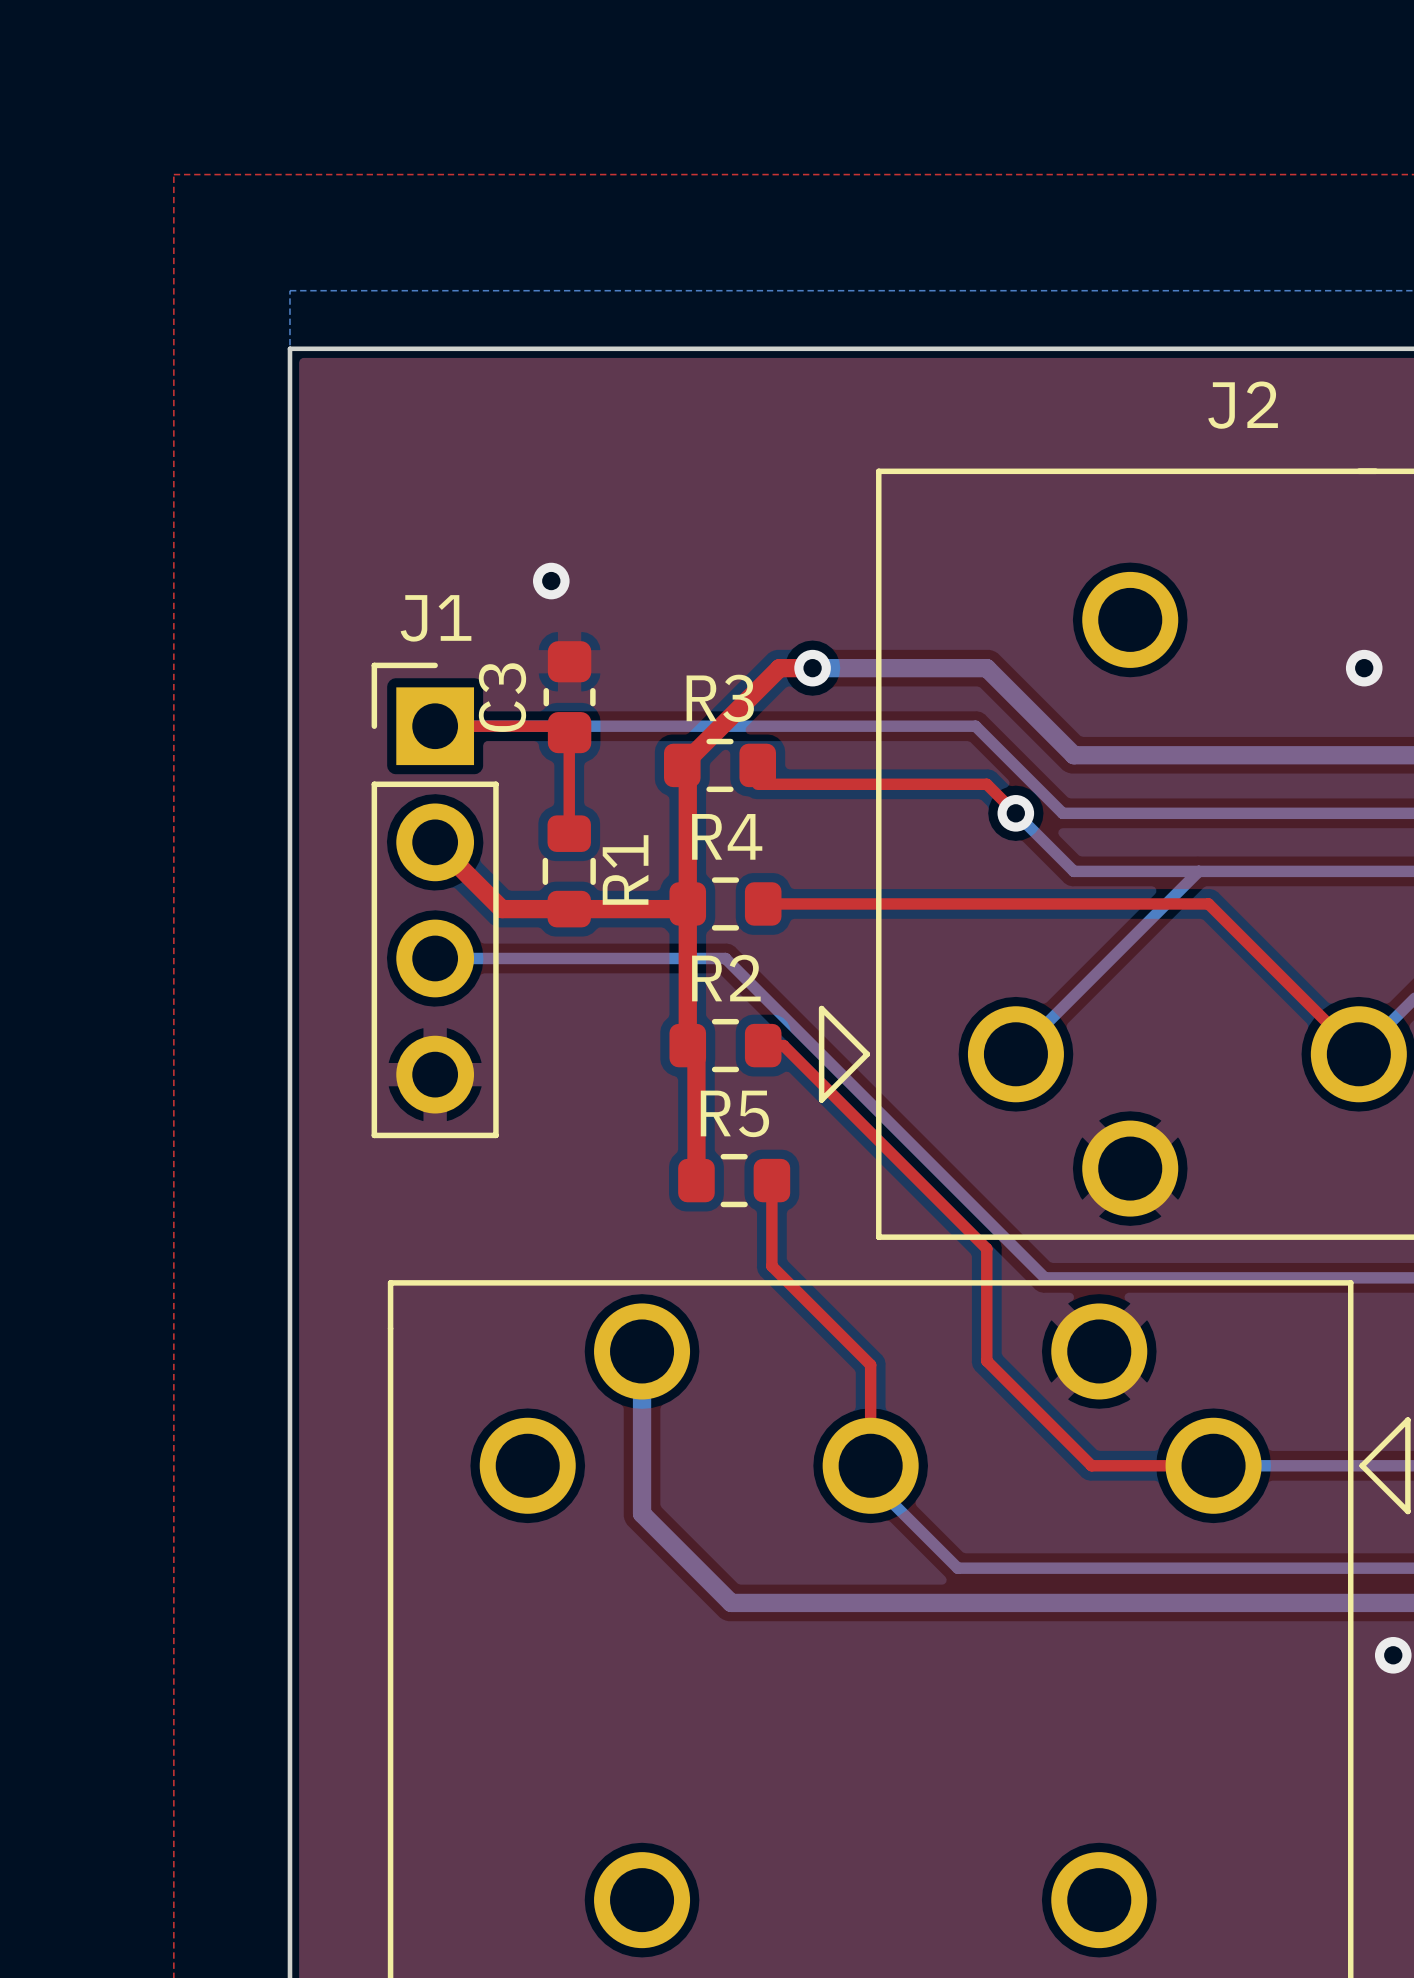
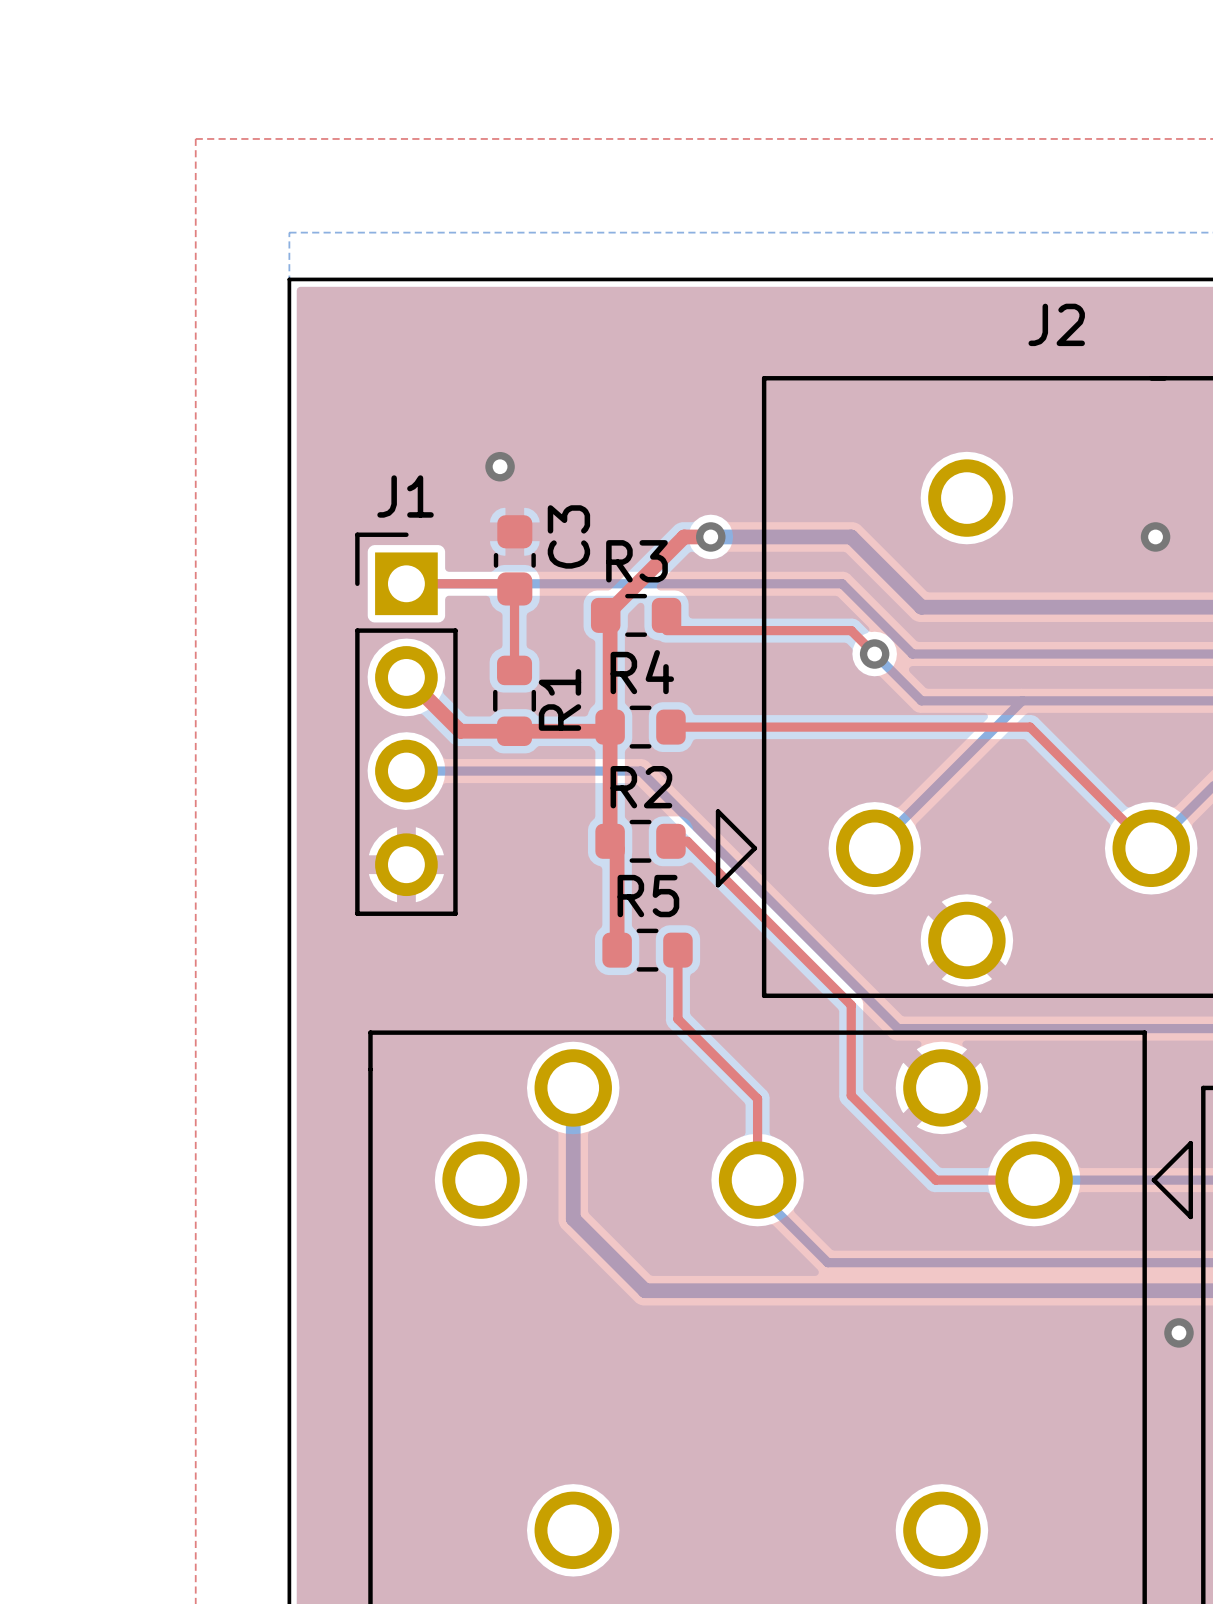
C3 name position: C3 (502, 697) -> C3 (568, 536)

